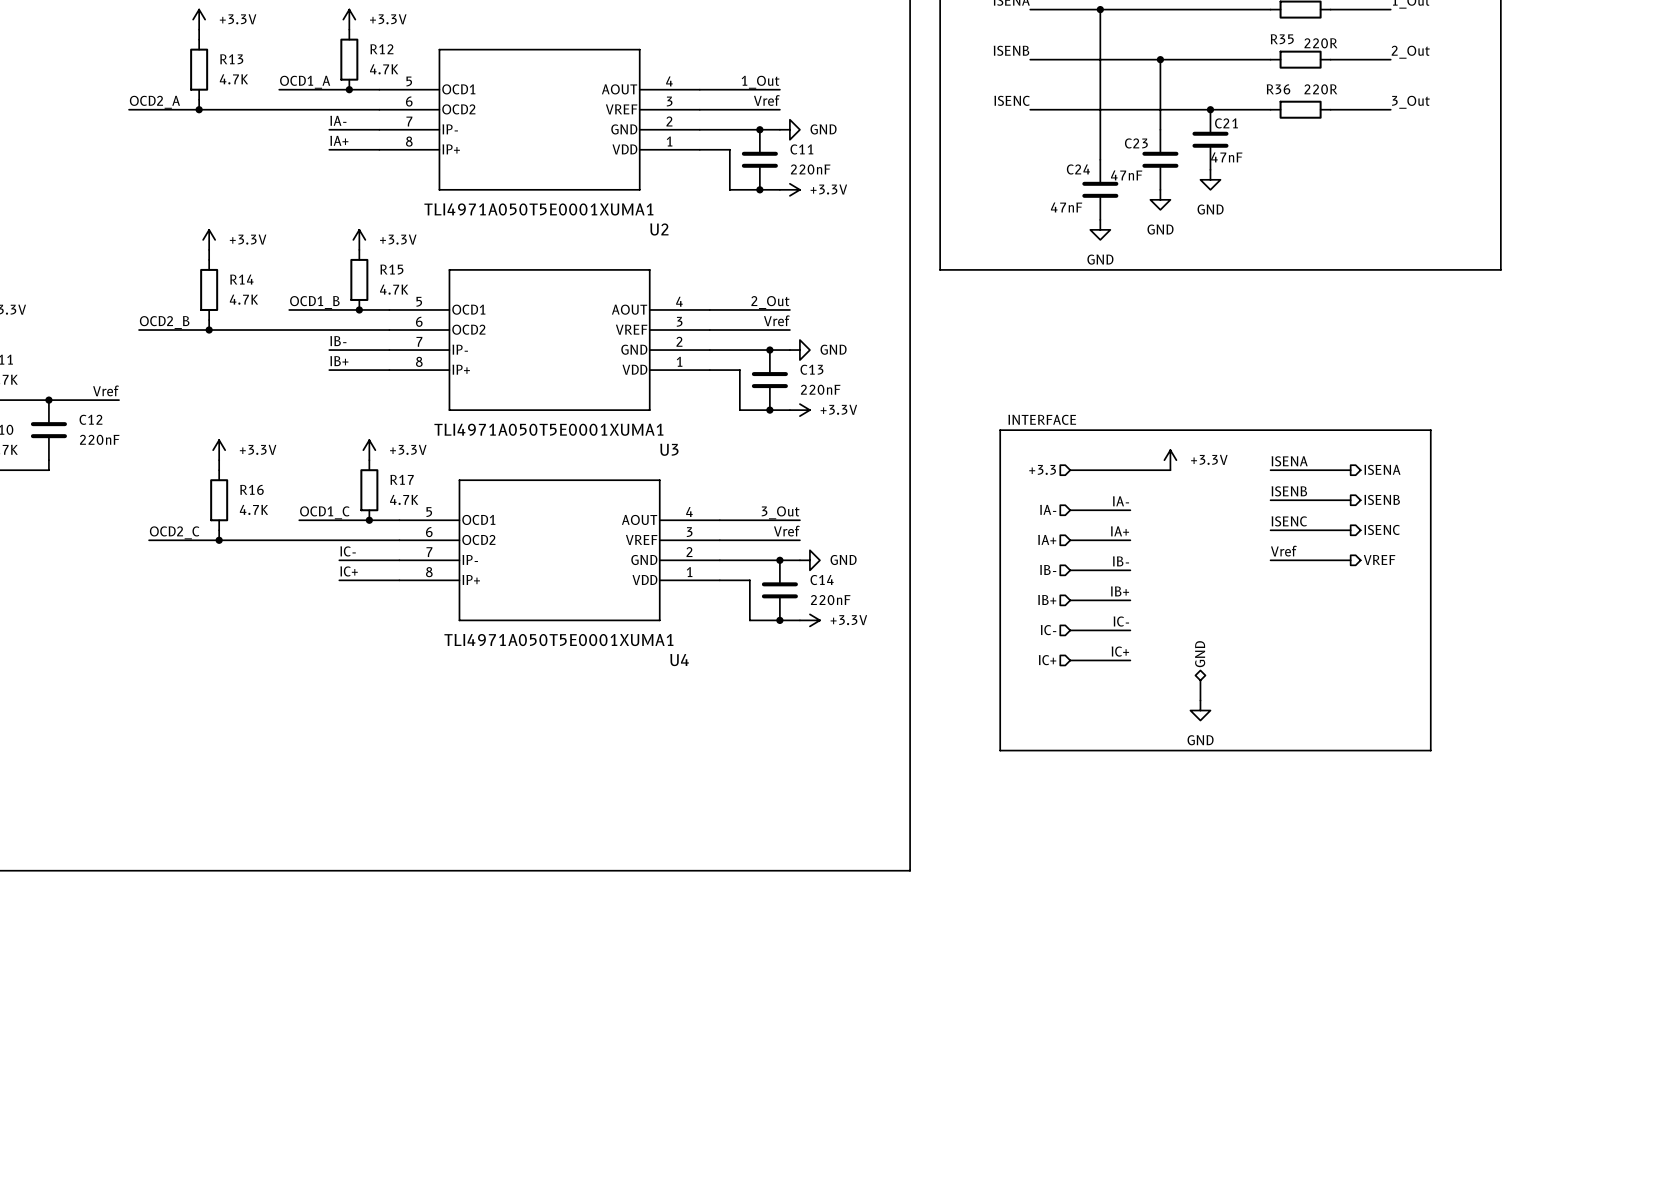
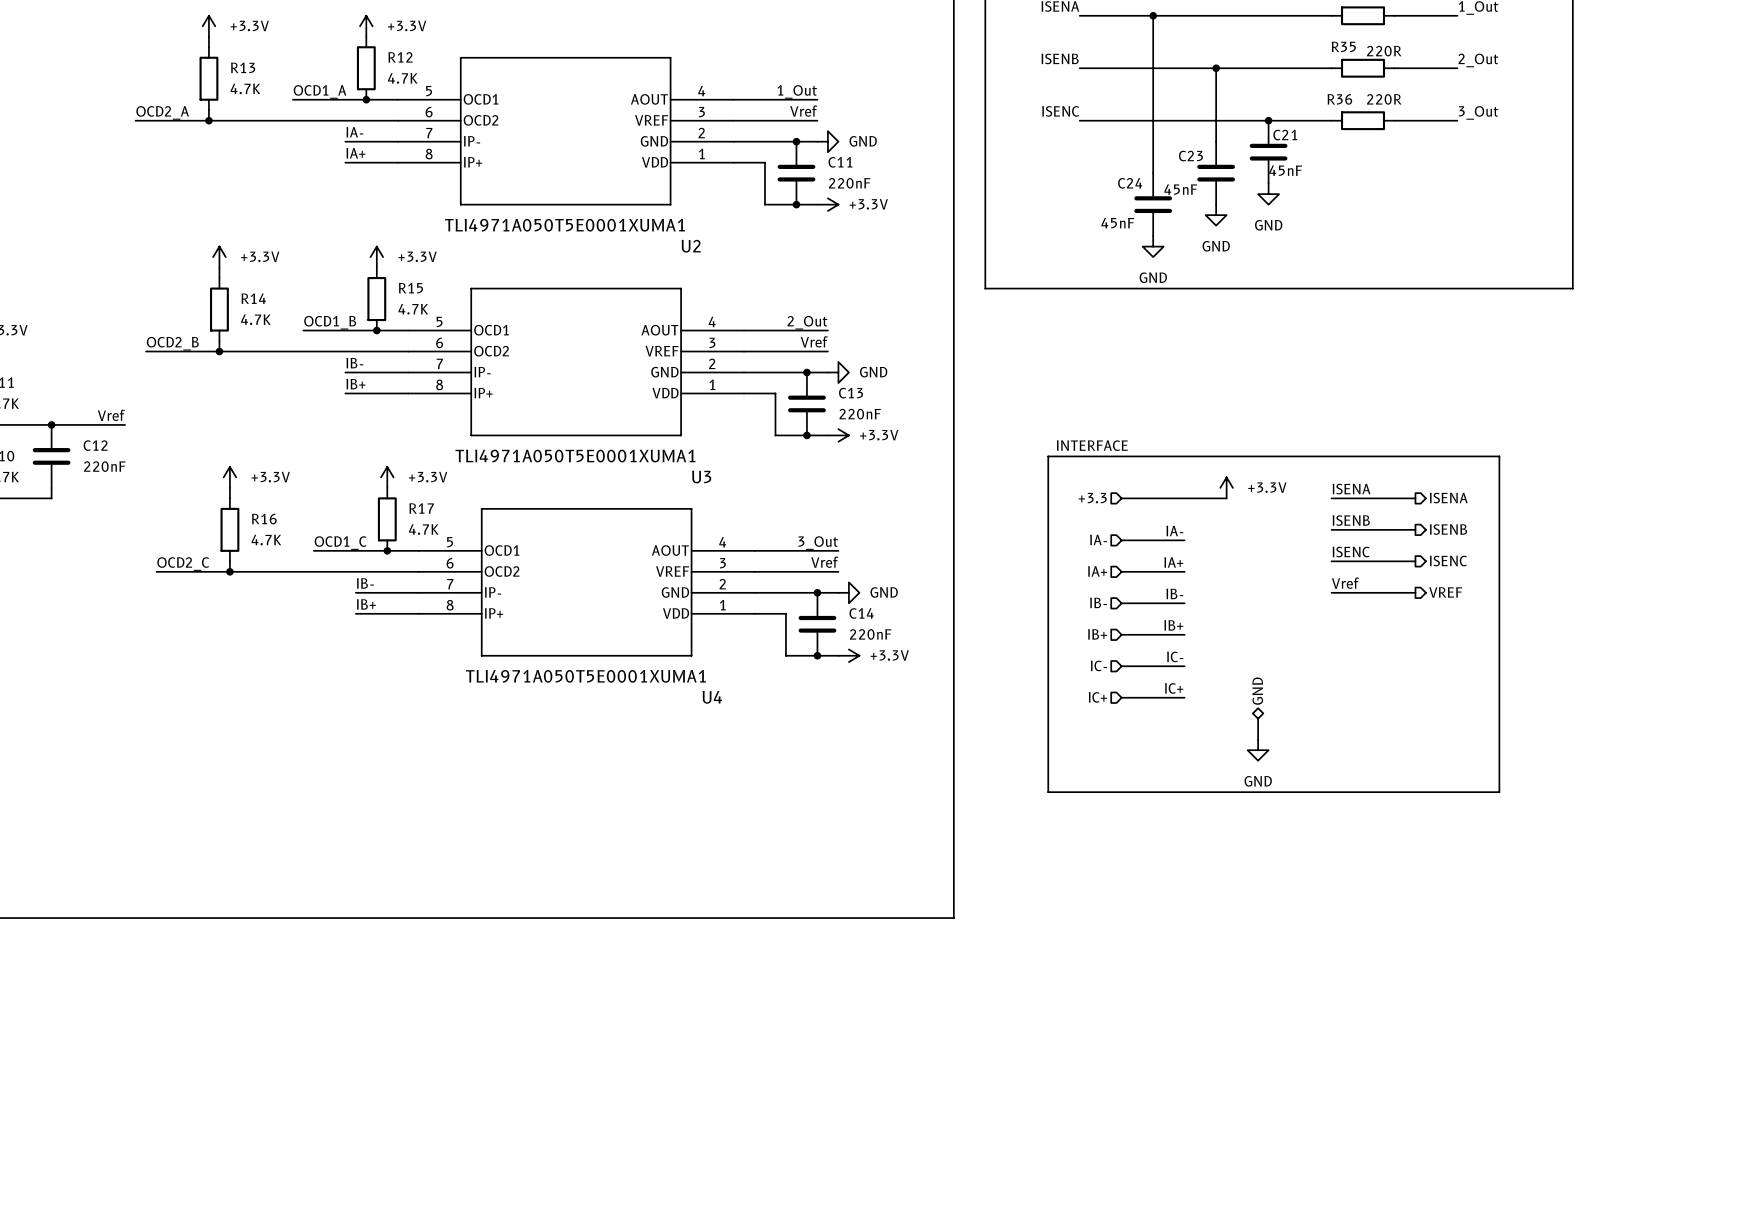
C21 value: 47nF (1226, 157) -> 45nF (1285, 170)
C23 value: 47nF (1126, 175) -> 45nF (1180, 189)
C24 value: 47nF (1066, 207) -> 45nF (1117, 223)
label: IC- (348, 551) -> IB- (365, 583)
label: IC+ (349, 571) -> IB+ (366, 604)

